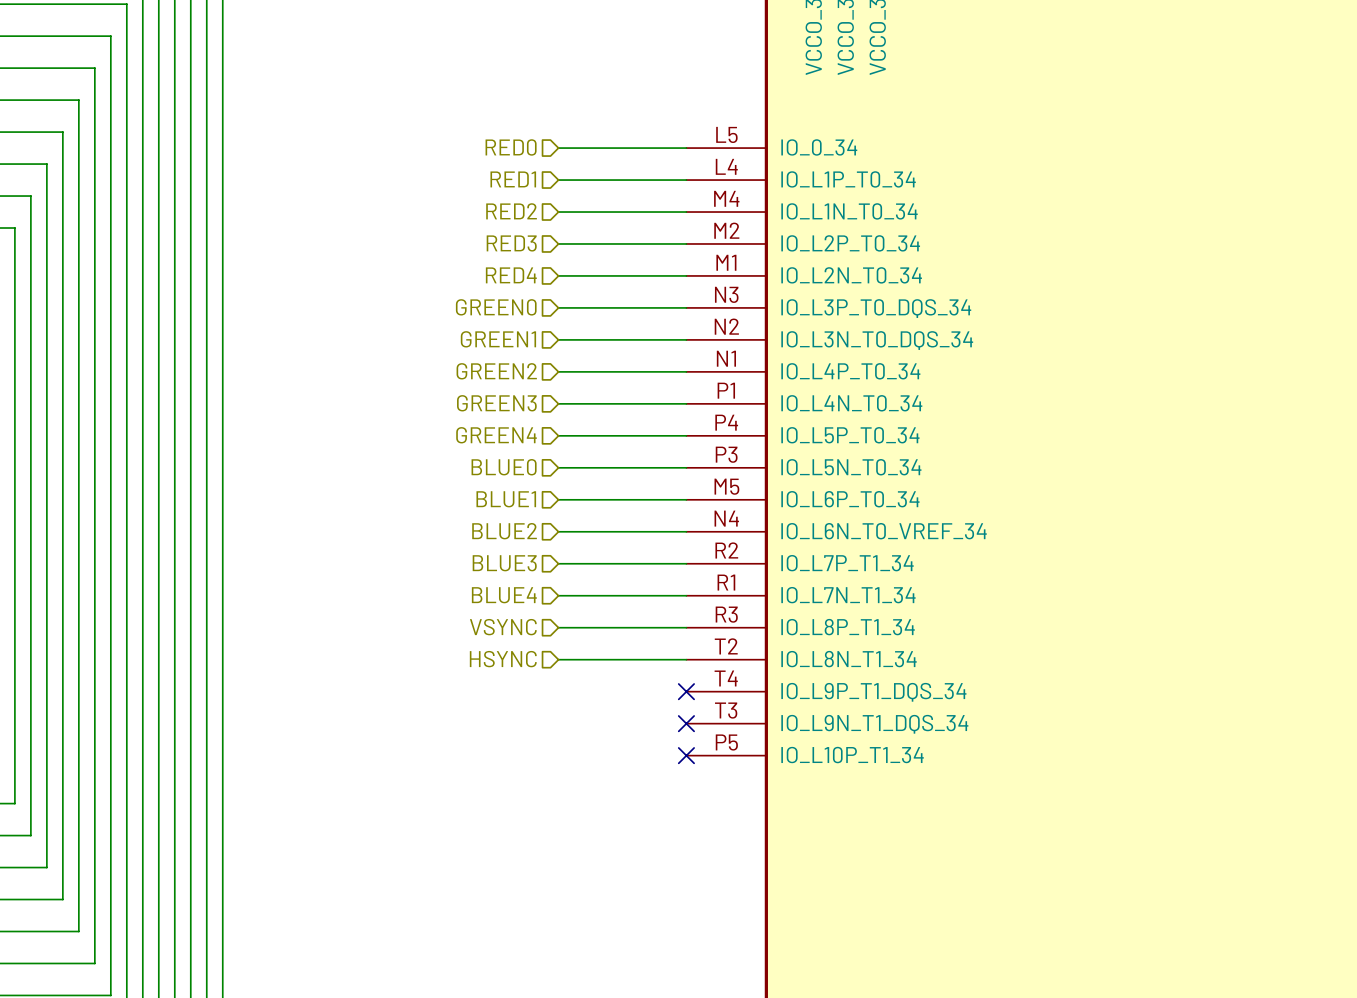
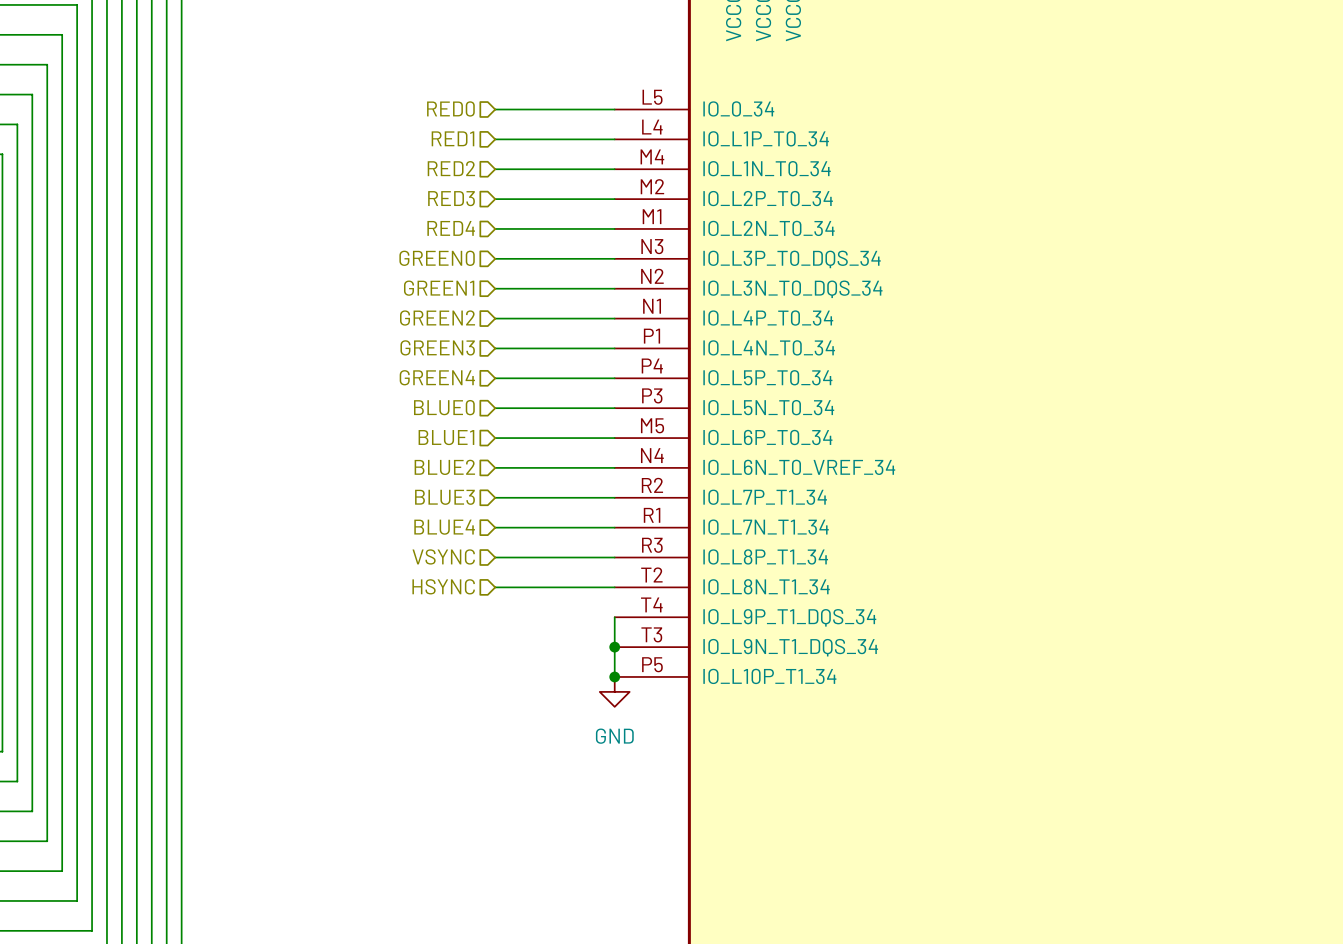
wire: none -> (614, 617) (614, 676)
no-connect mark: (686, 691) -> none
no-connect mark: (686, 723) -> none
junction: none -> (614, 647)
no-connect mark: (686, 755) -> none
junction: none -> (614, 676)
power symbol: none -> GND (614, 691)

